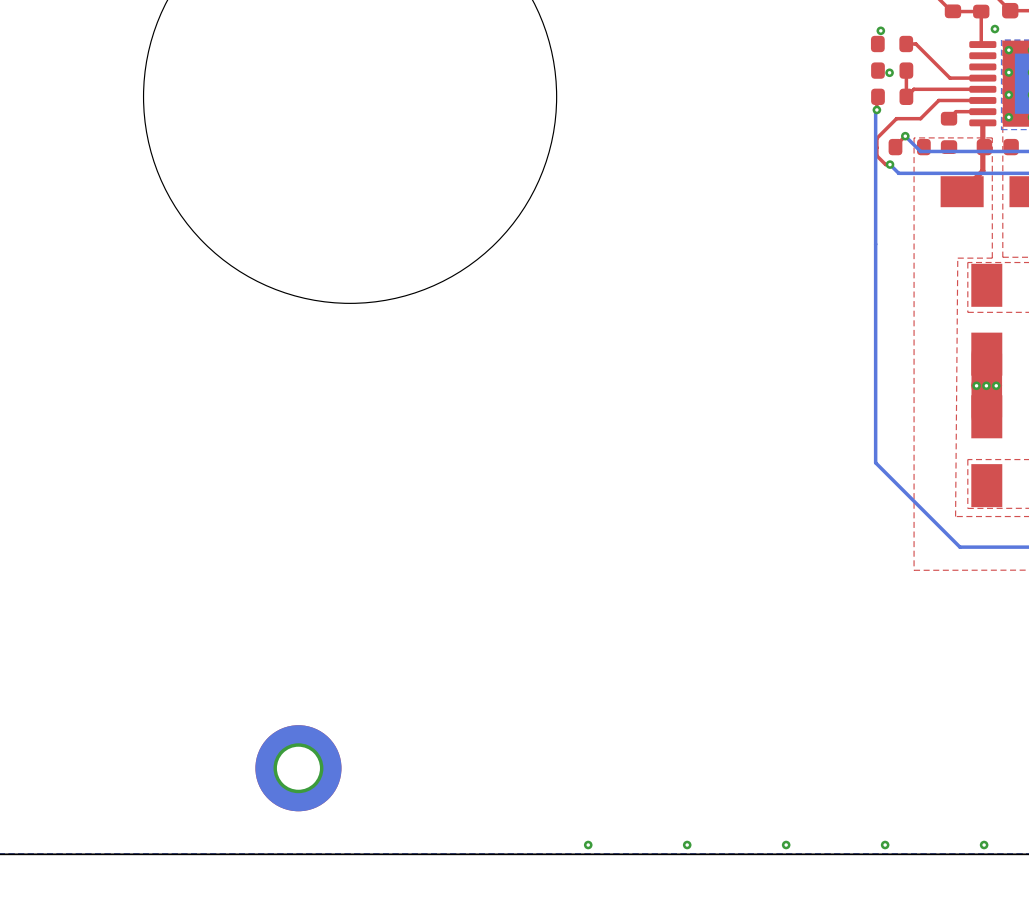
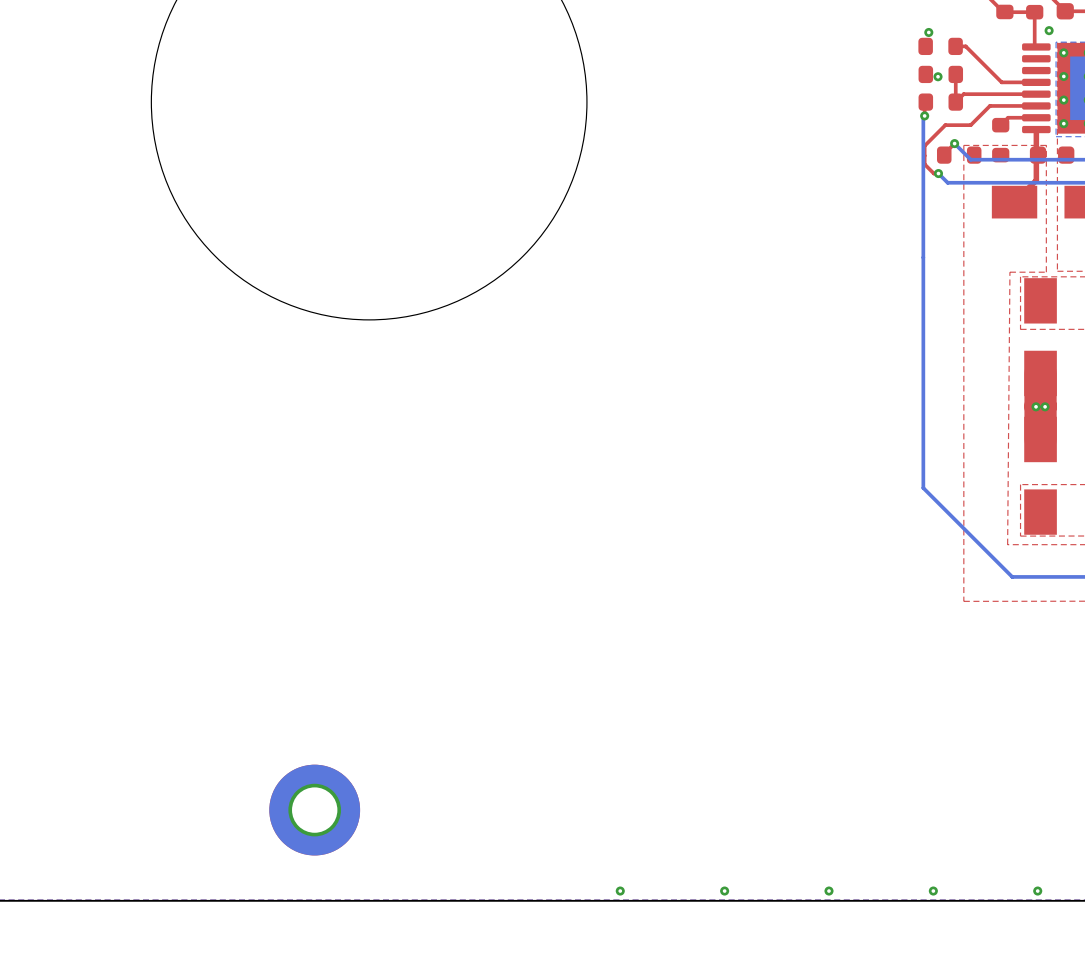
via: (976, 385) -> none
via: none -> (1036, 406)
via: (986, 385) -> none
via: none -> (1045, 406)
via: (996, 385) -> none

